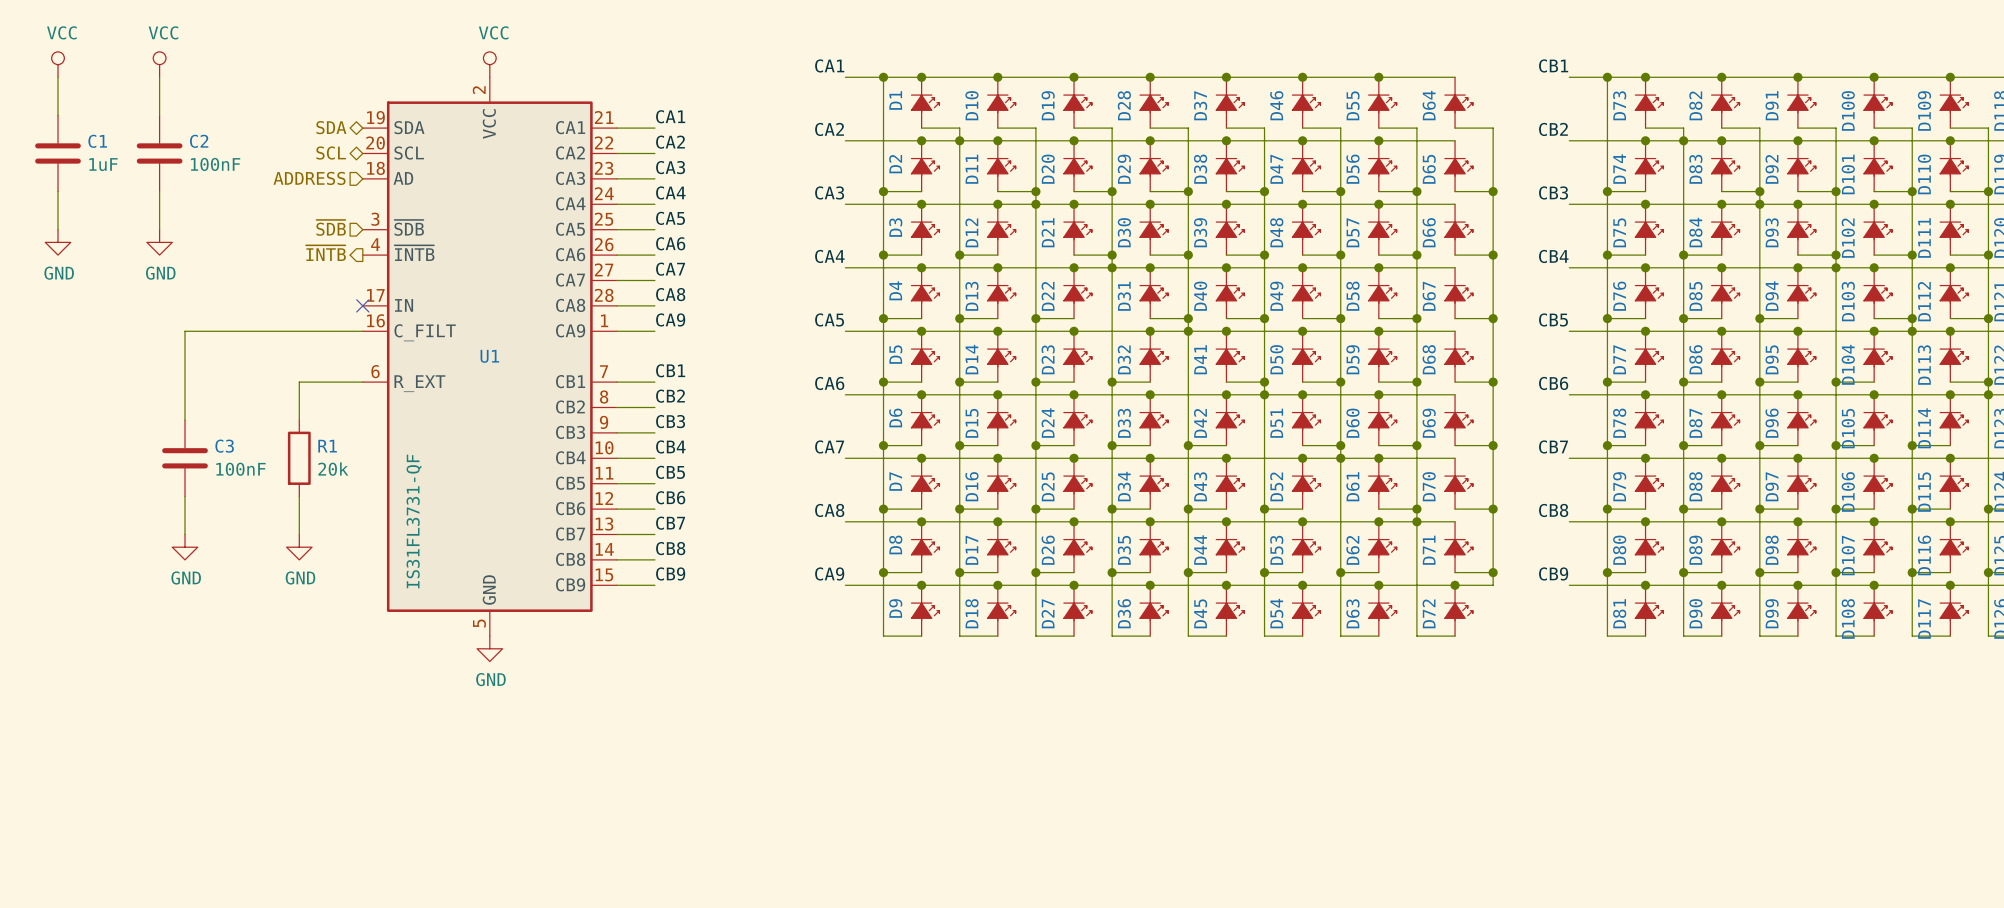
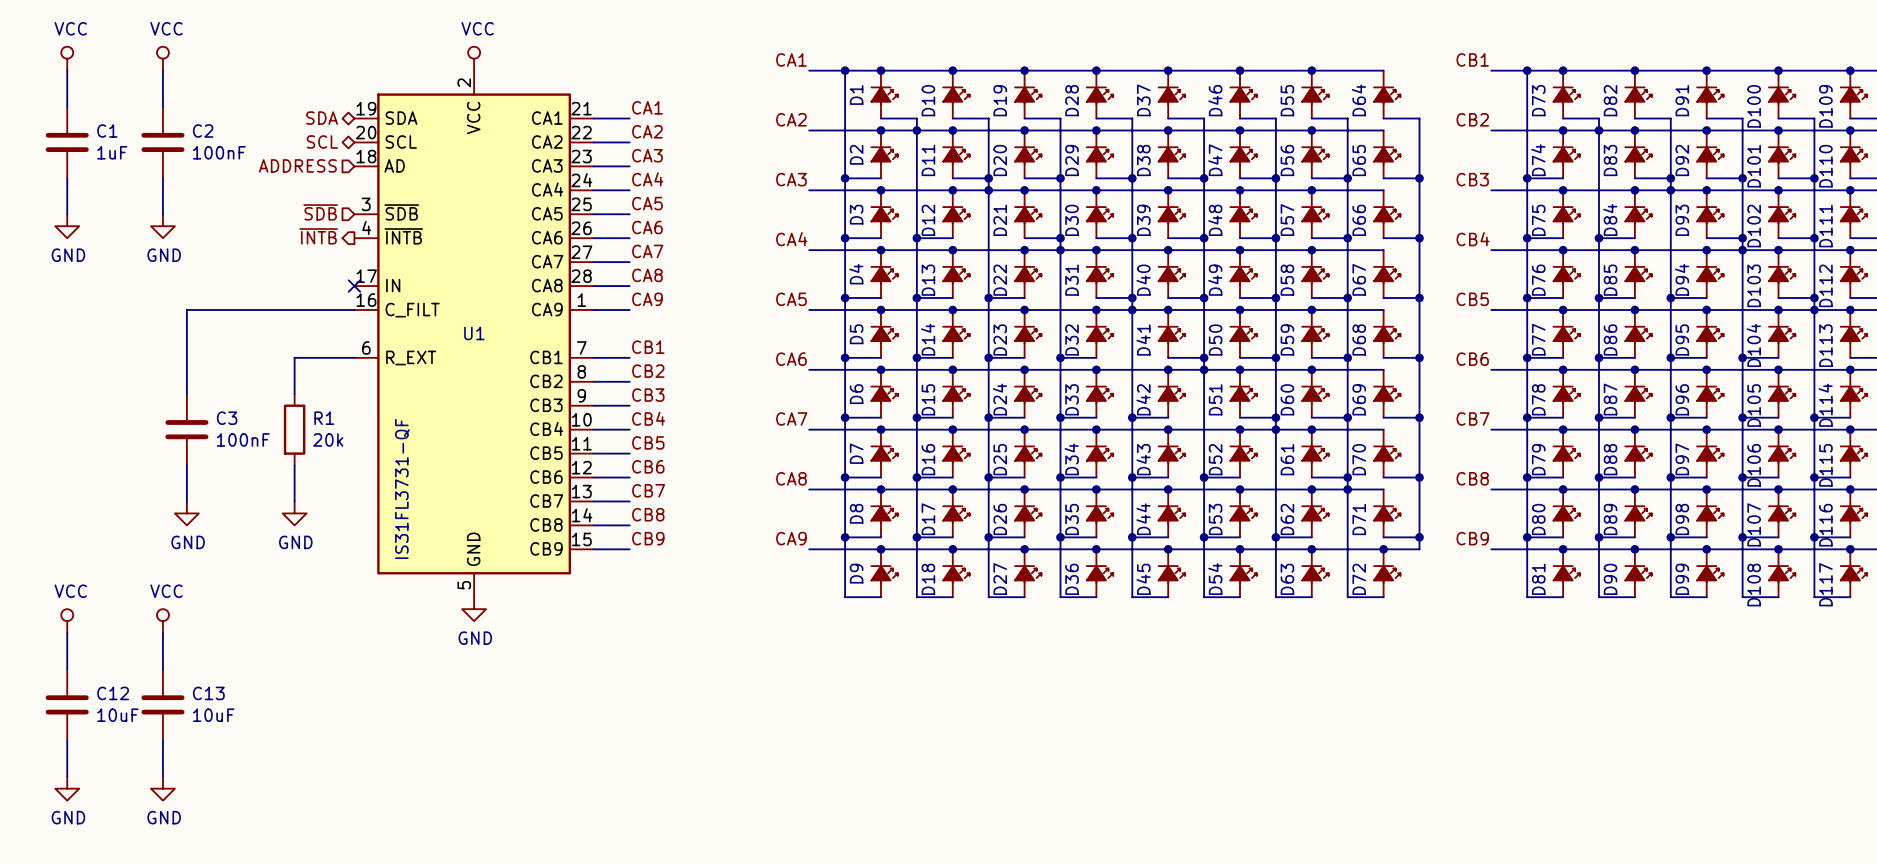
power symbol: none -> VCC (67, 621)
power symbol: none -> VCC (162, 621)
wire: none -> (67, 633) (67, 669)
wire: none -> (162, 633) (162, 669)
C12: none -> 10uF (67, 704)
C13: none -> 10uF (162, 704)
wire: none -> (67, 740) (67, 776)
wire: none -> (162, 740) (162, 776)
power symbol: none -> GND (67, 788)
power symbol: none -> GND (162, 788)

